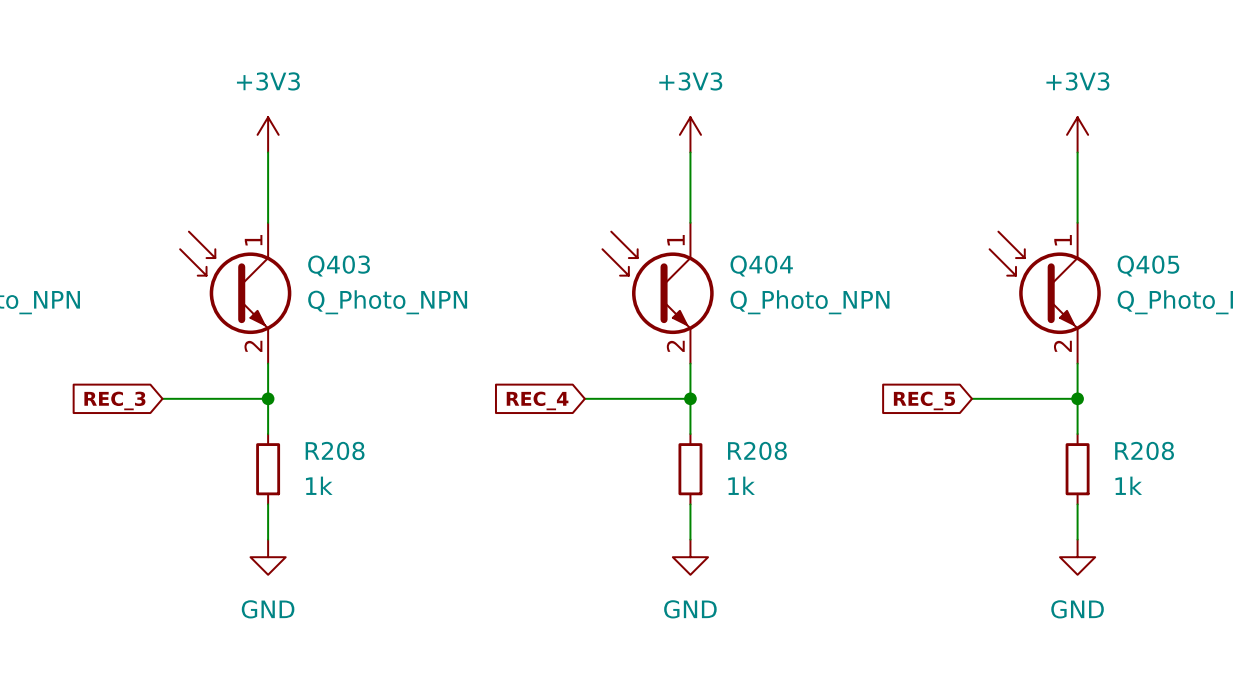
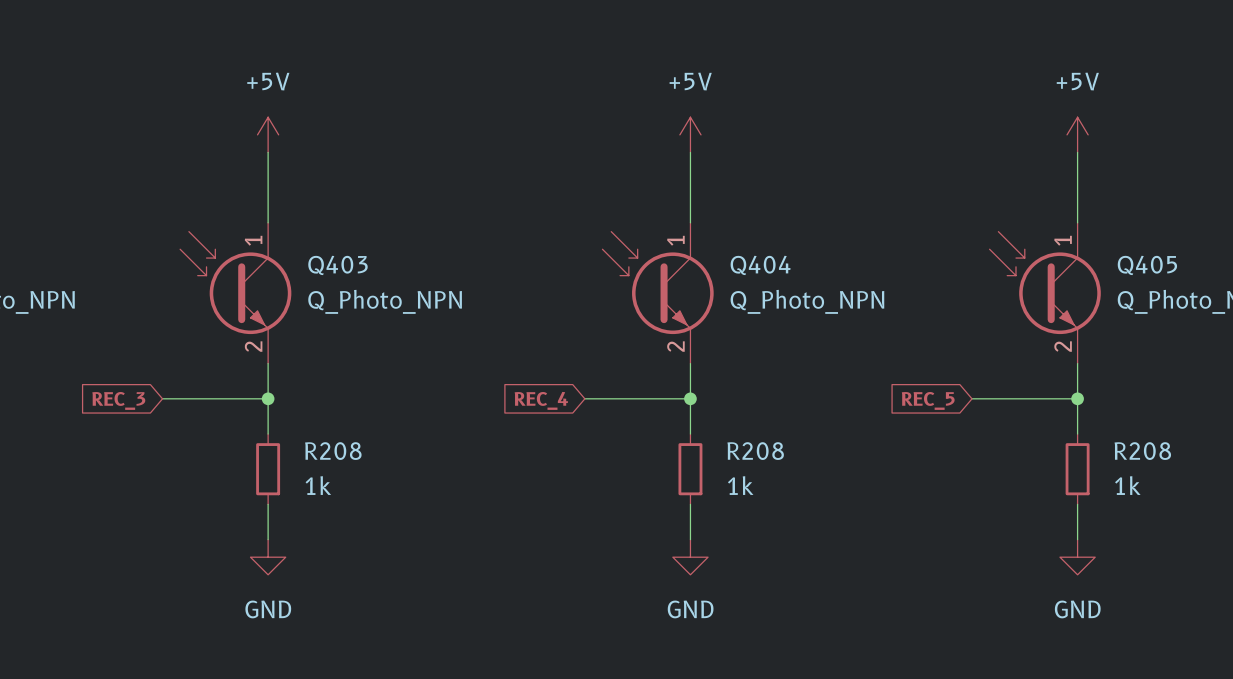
power symbol: +3V3 (268, 134) -> +5V (268, 134)
power symbol: +3V3 (690, 134) -> +5V (690, 134)
power symbol: +3V3 (1077, 134) -> +5V (1077, 134)

